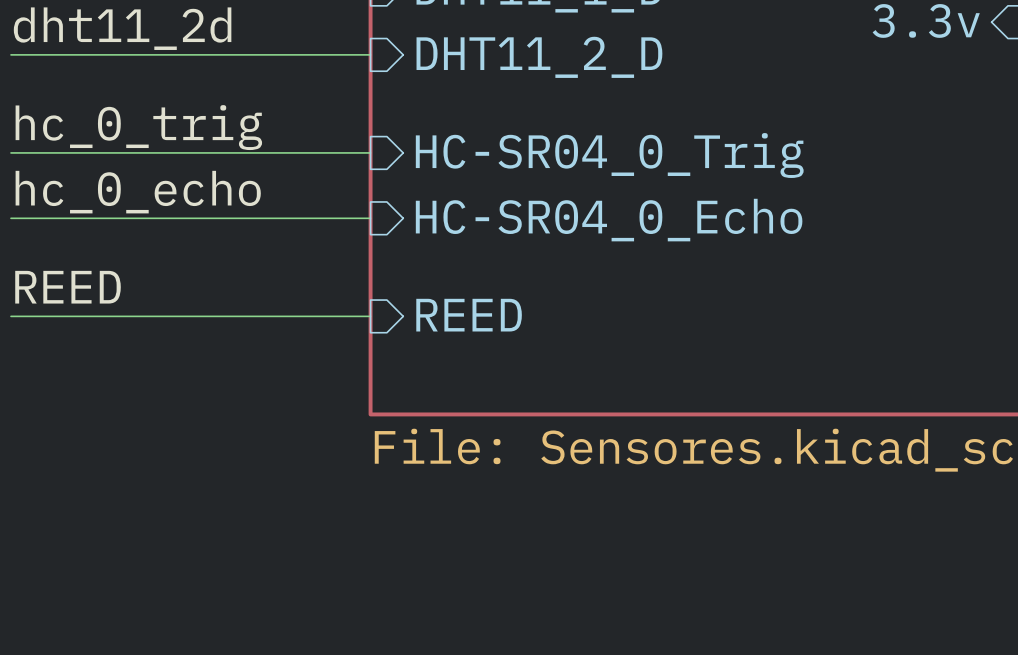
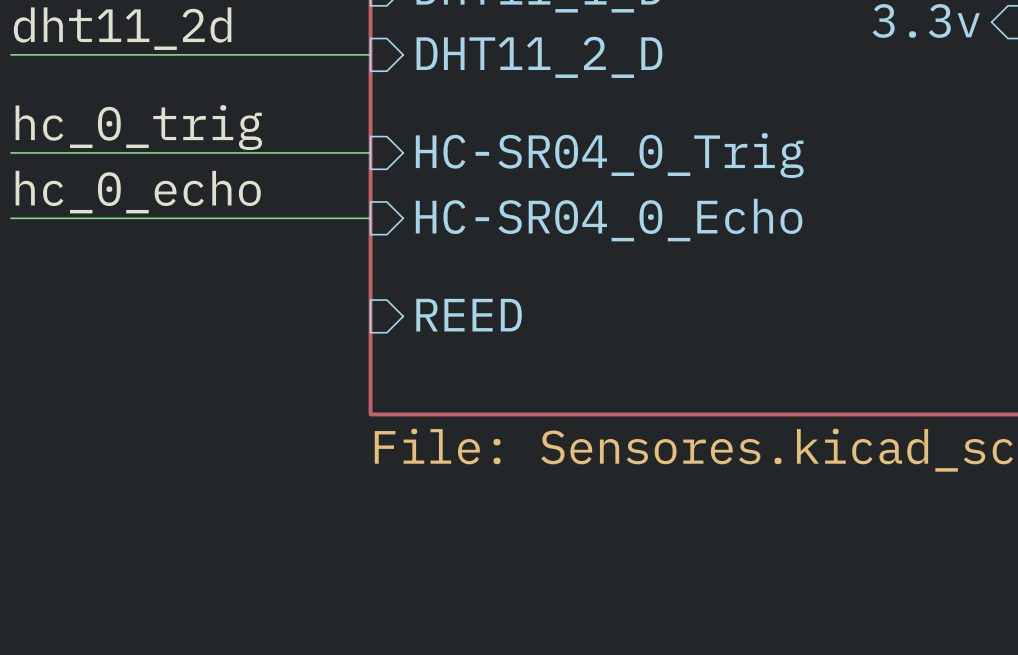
label: REED (68, 287) -> none
wire: (11, 316) (370, 316) -> none

